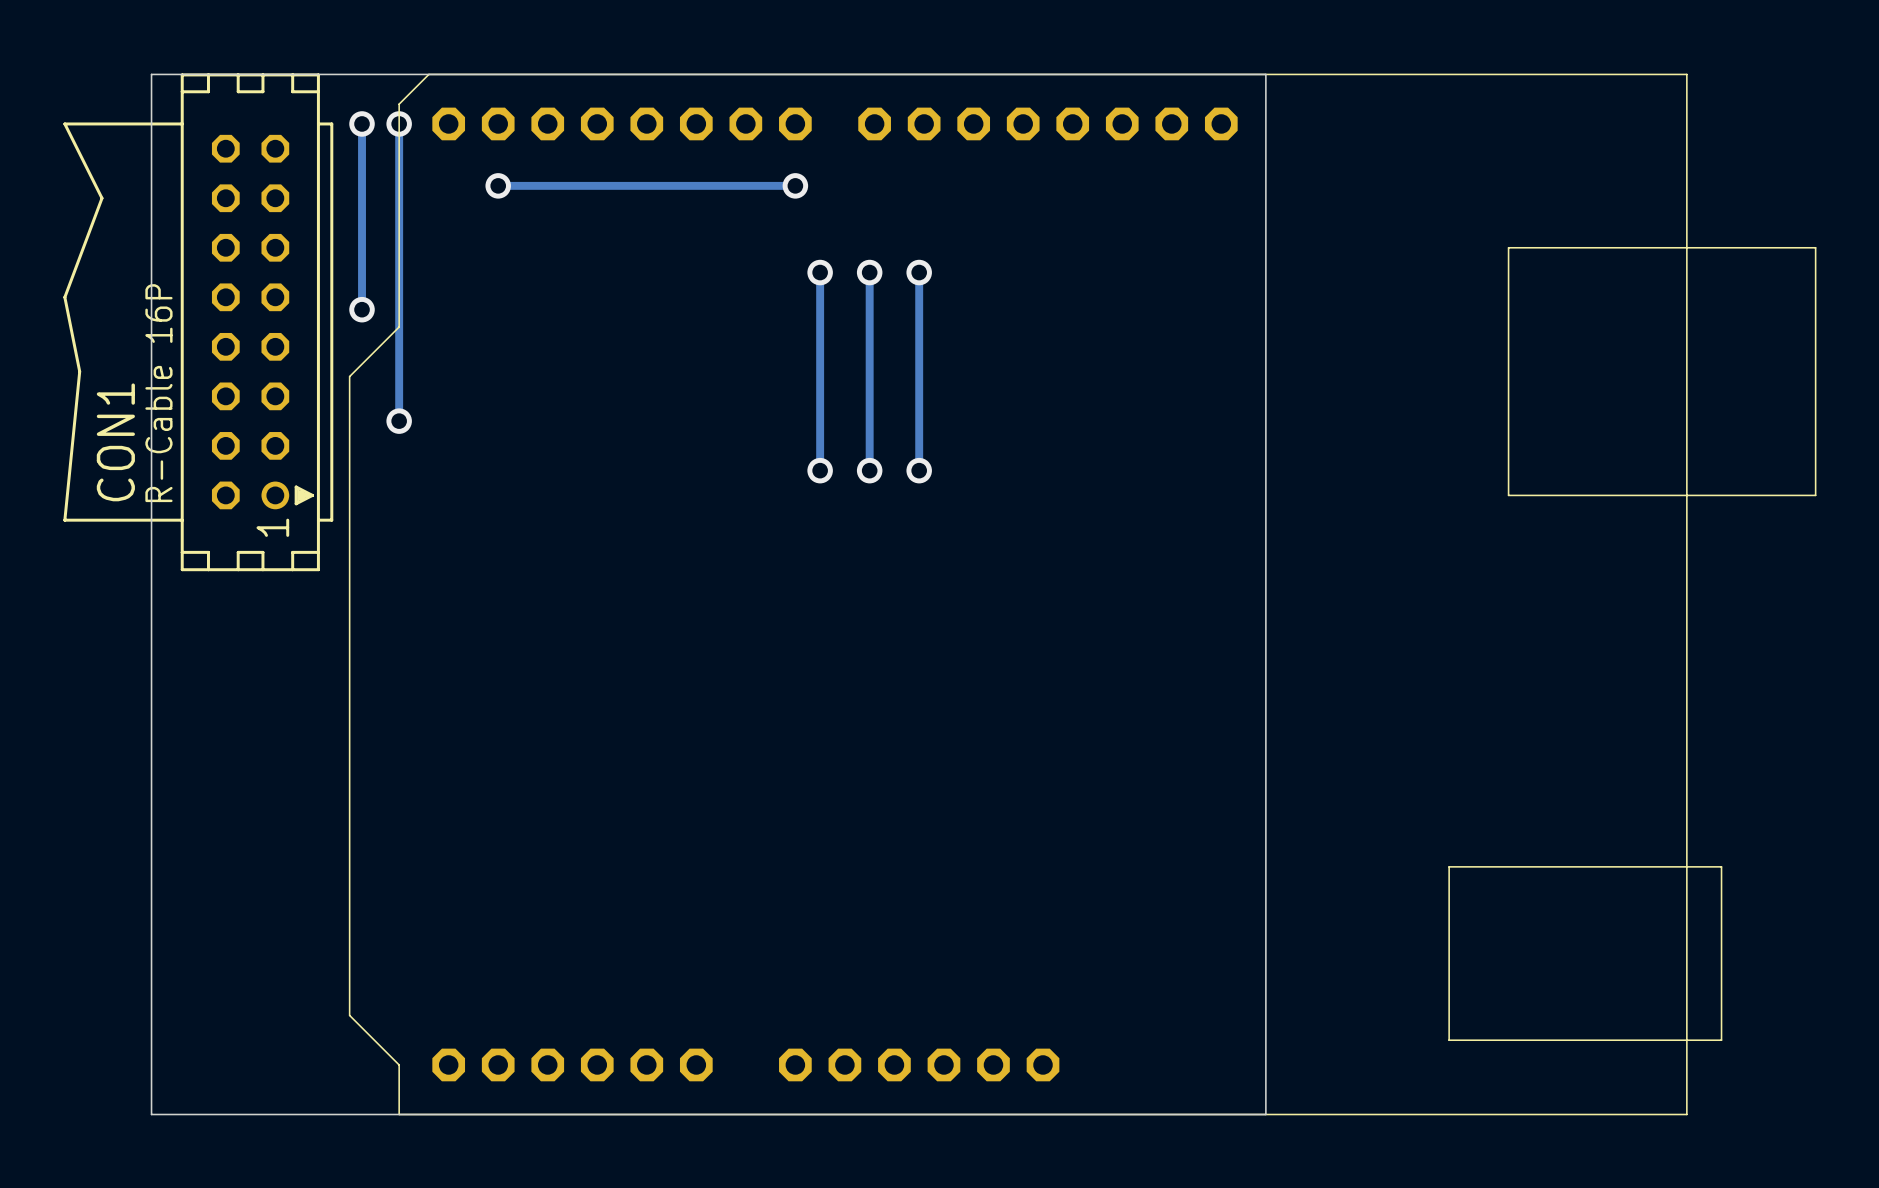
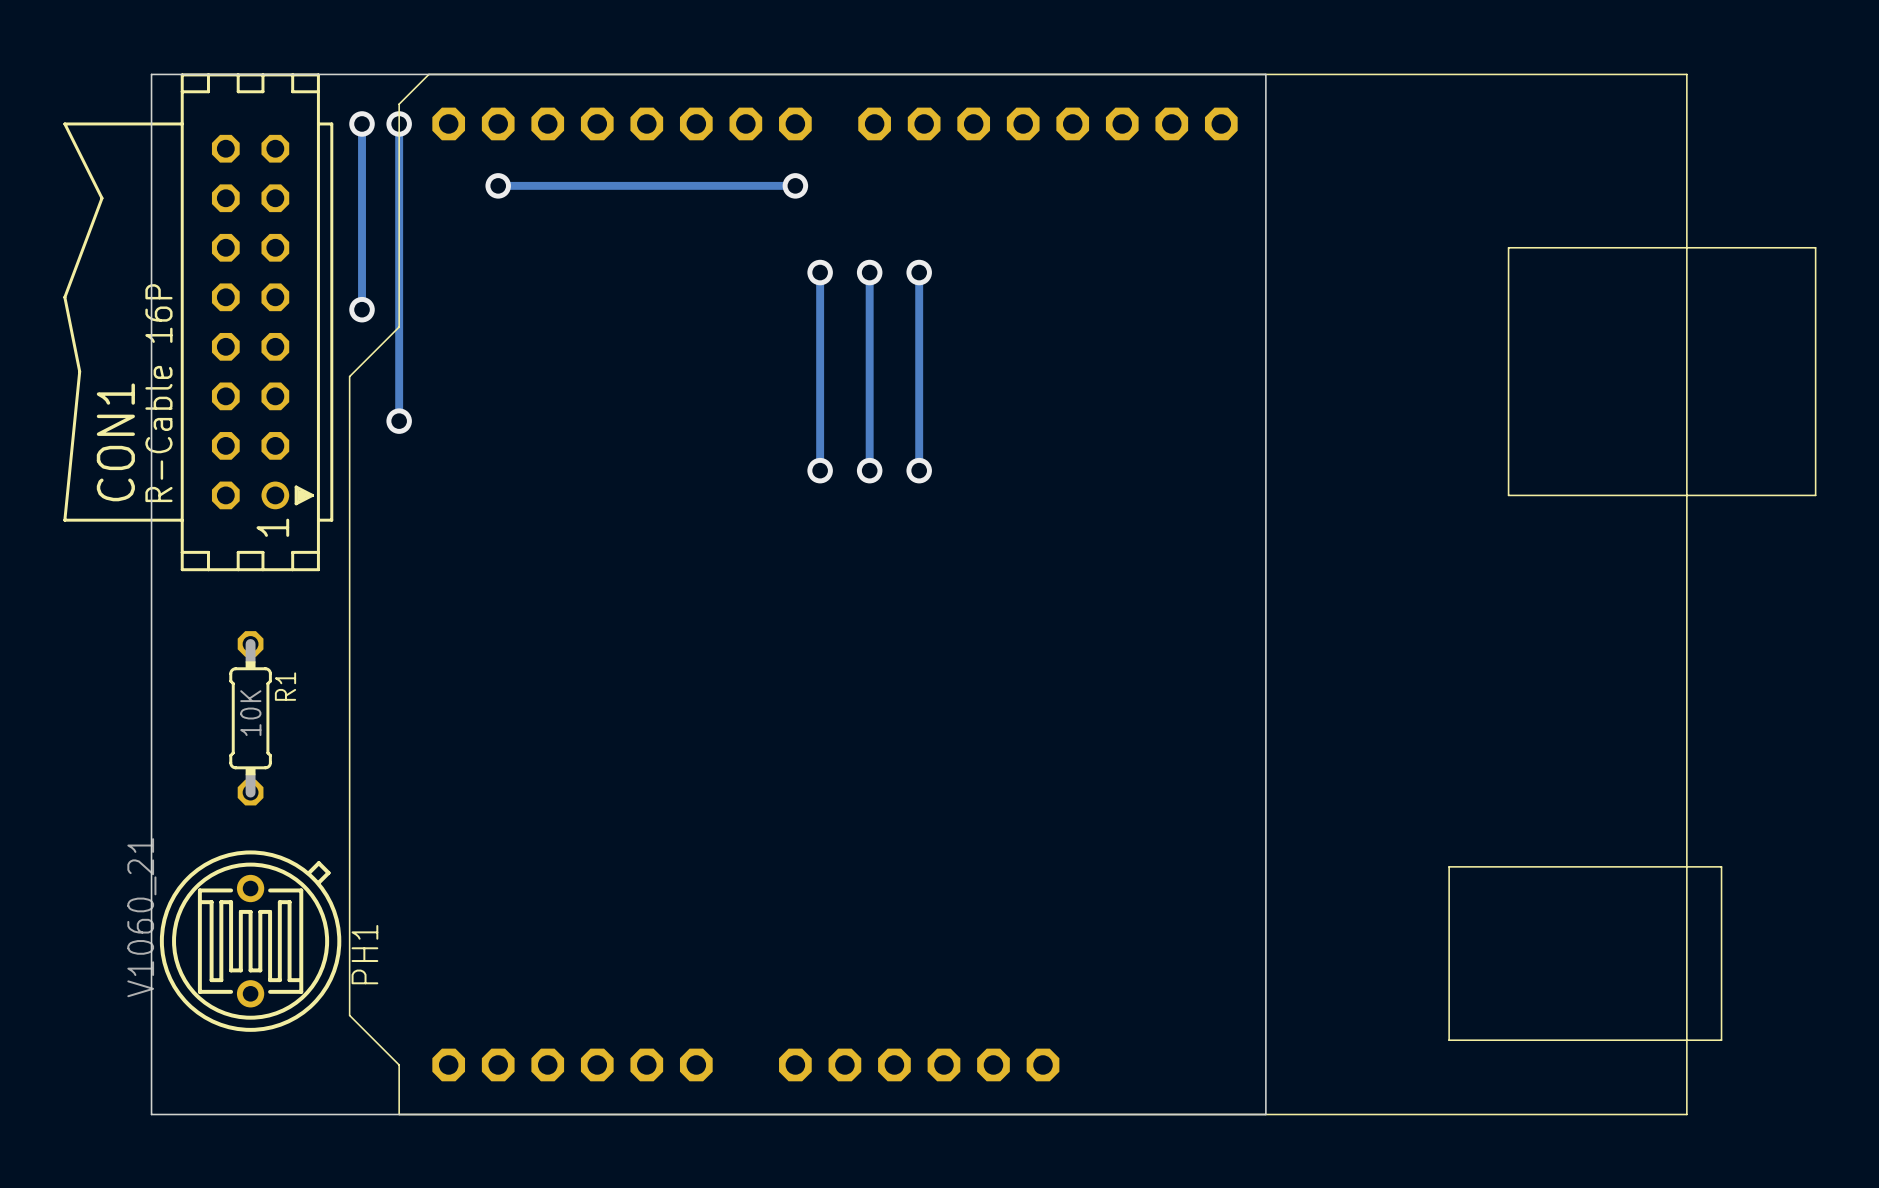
R1: none -> 10K (250, 718)
PH1: none -> V1060_21 (250, 941)

